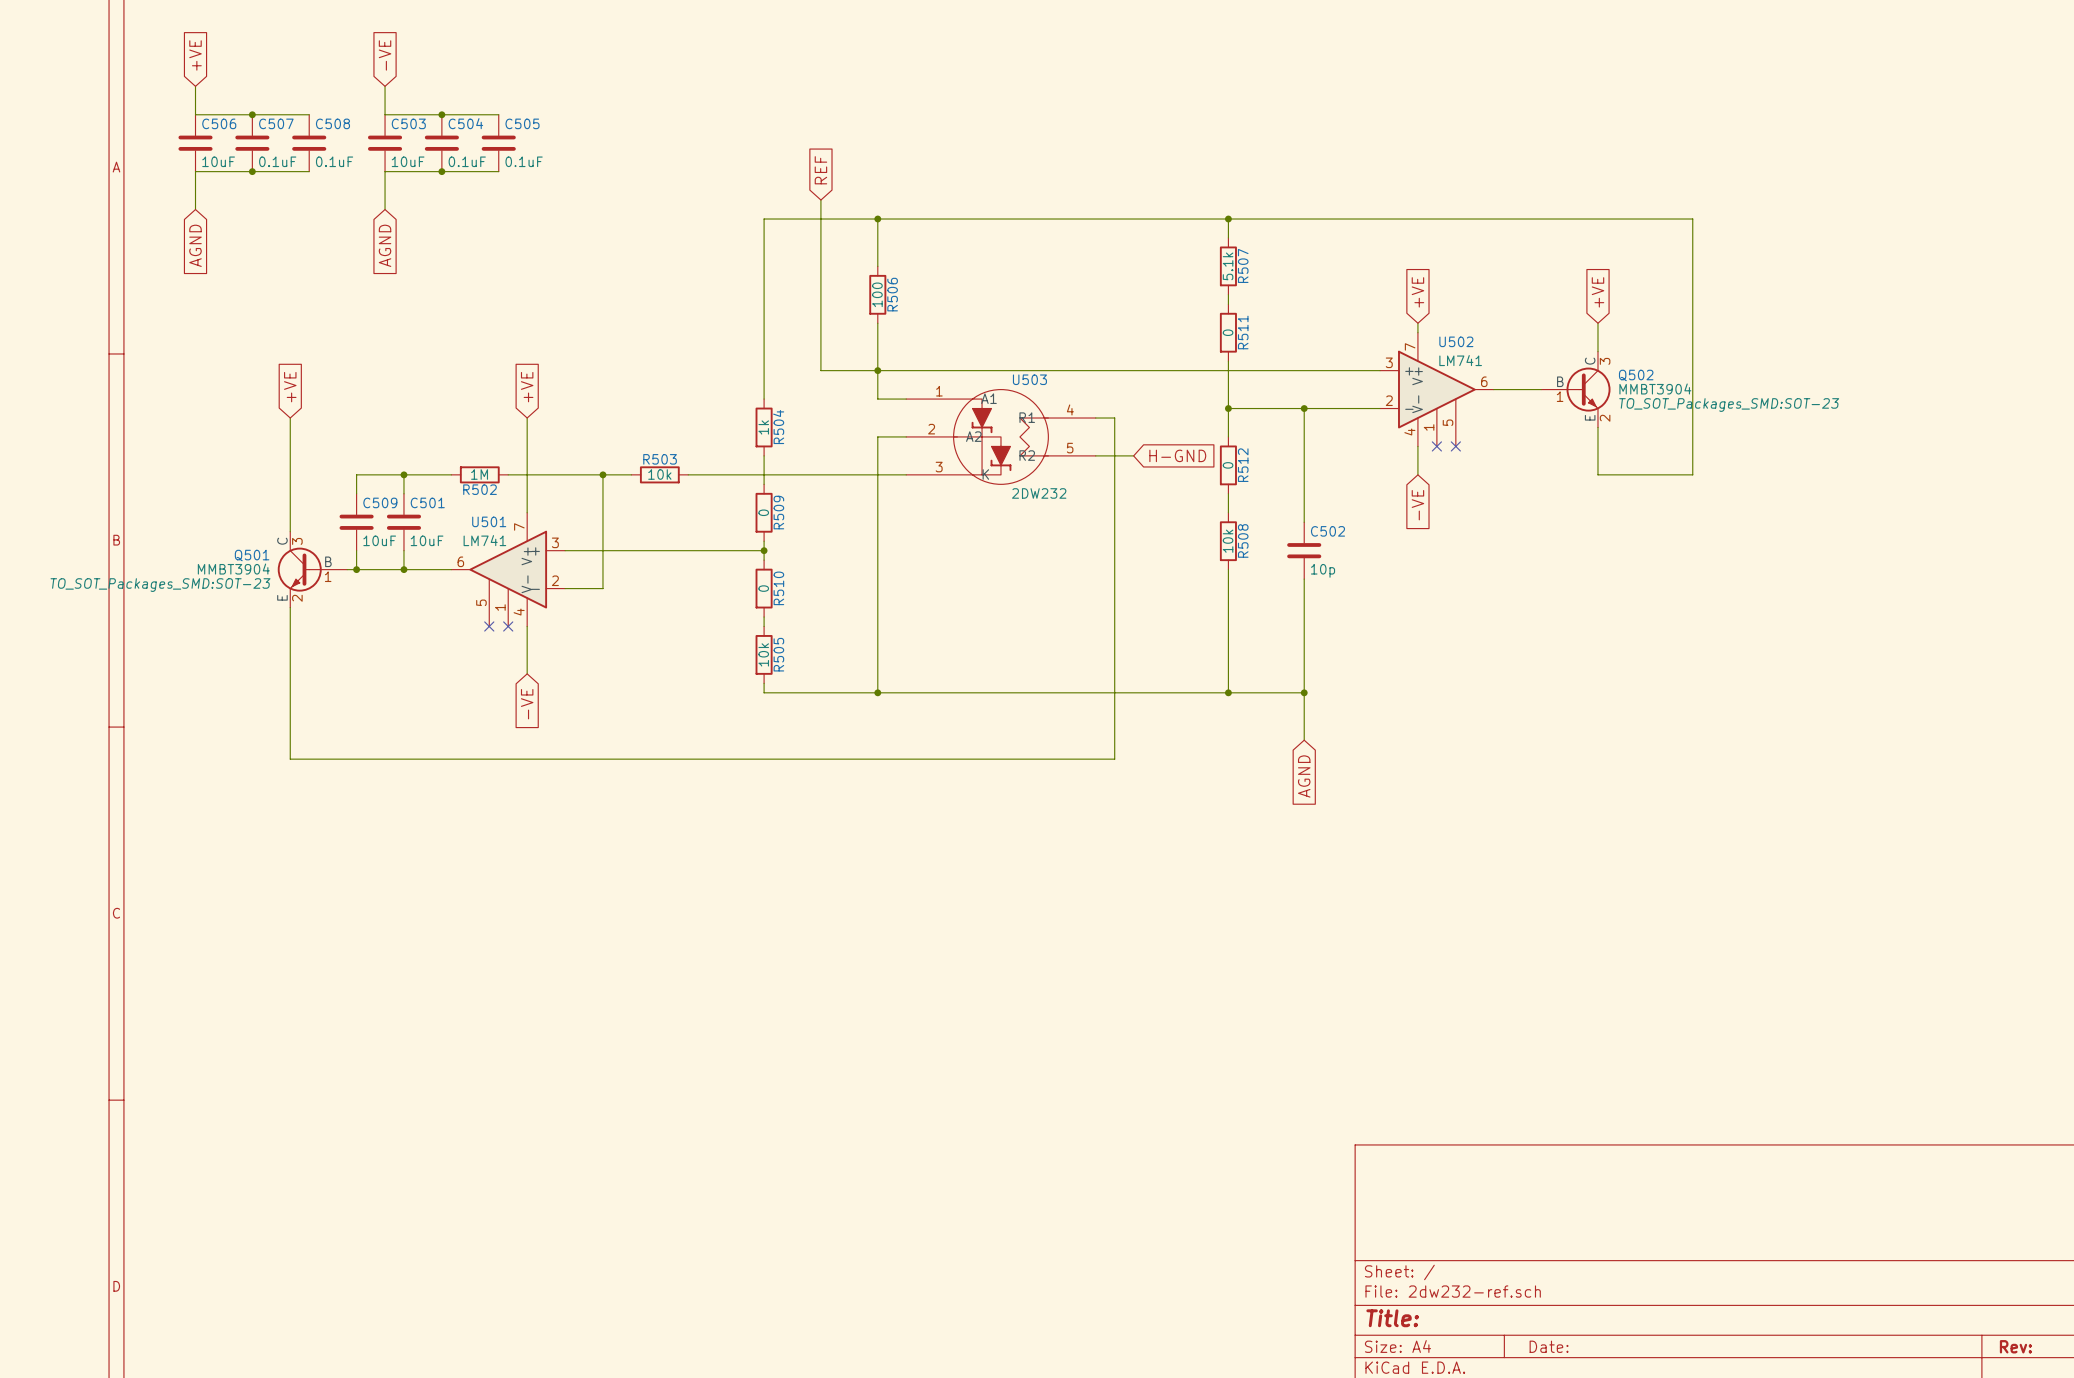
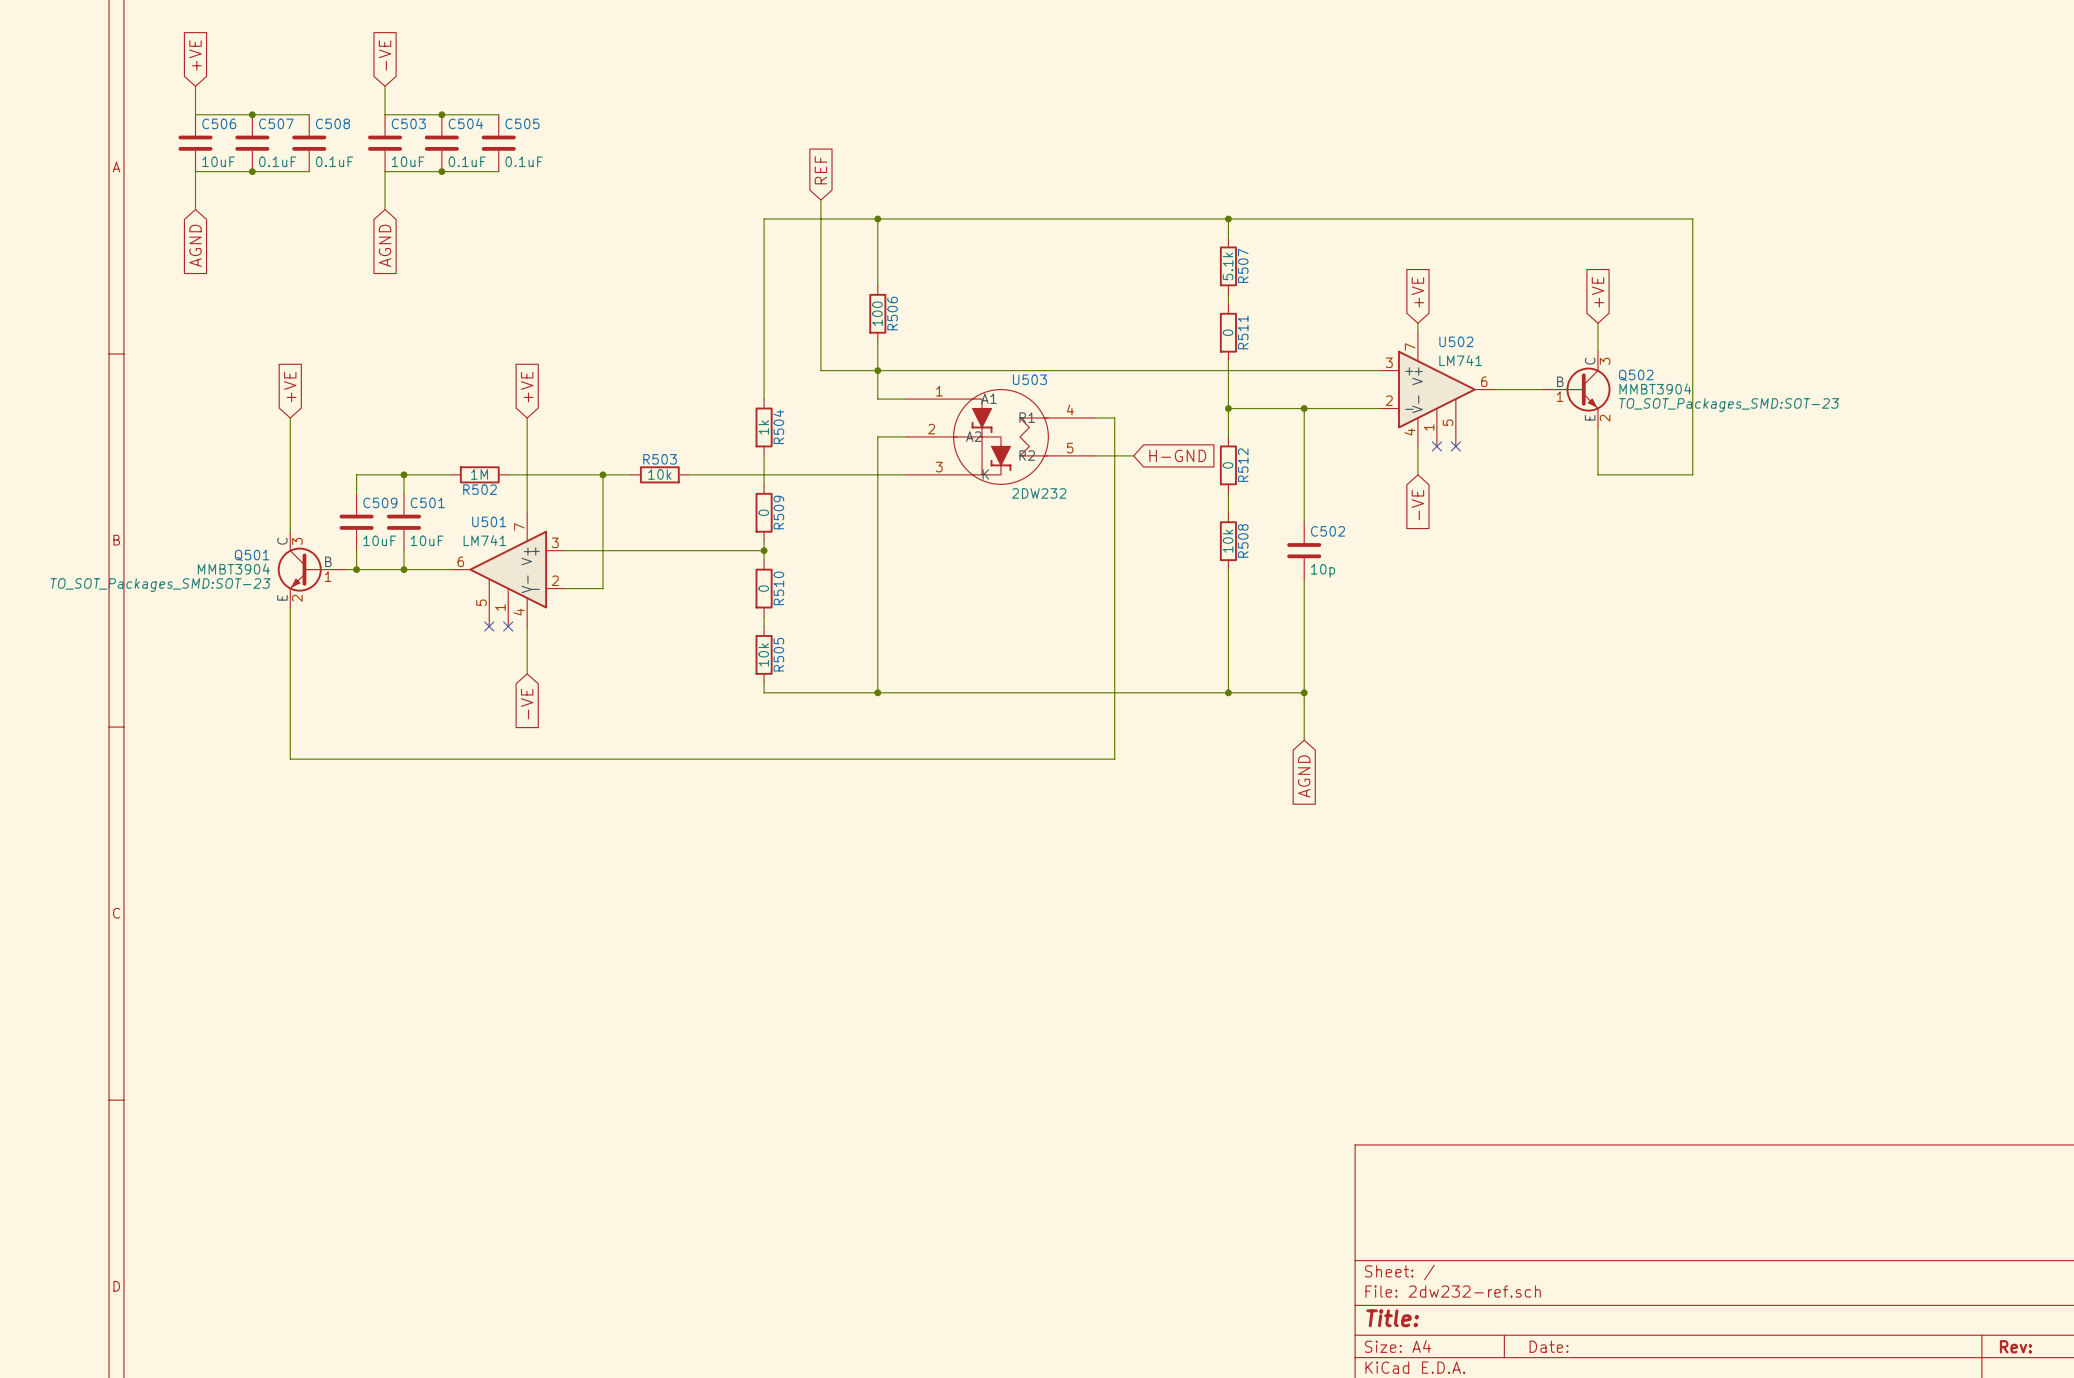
R506 position: (877, 294) -> (877, 313)

